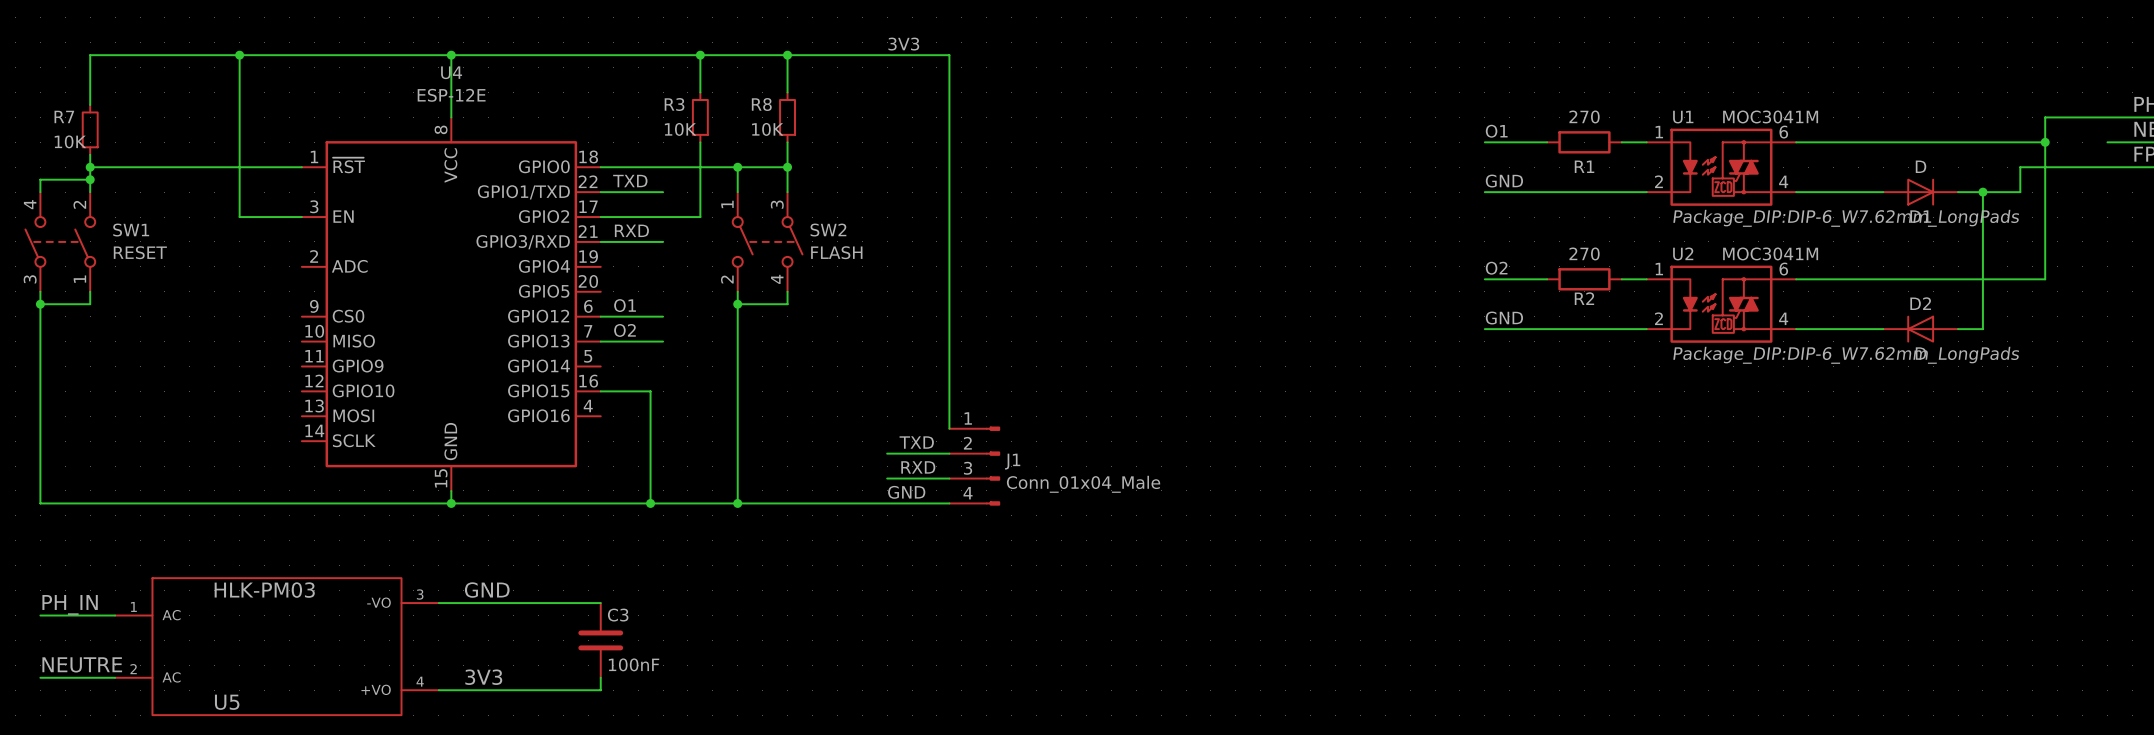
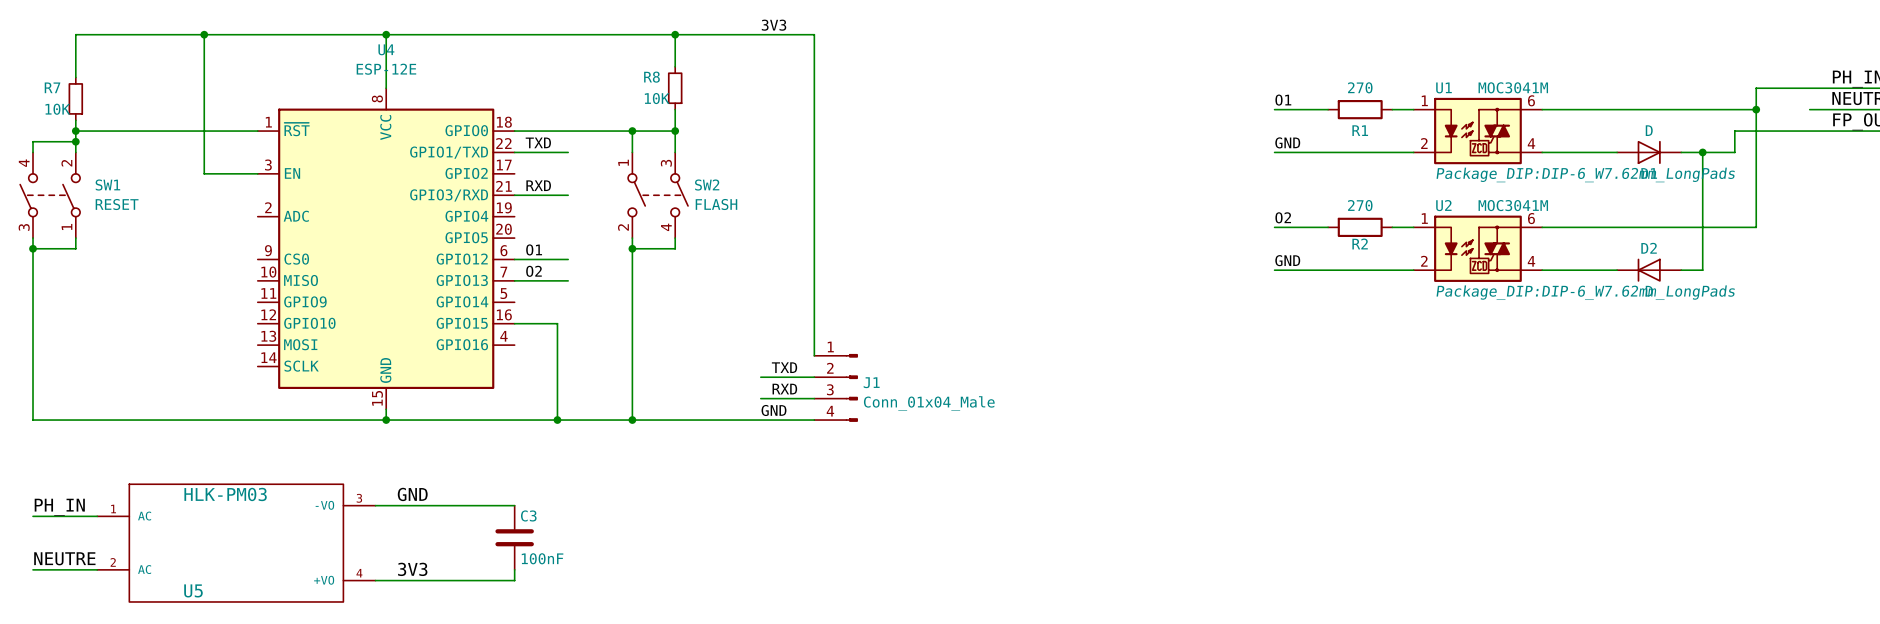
wire: (700, 55) (700, 92) -> none
junction: (700, 55) -> none
R3: 10K (700, 117) -> none
wire: (700, 142) (700, 217) (600, 217) -> none

